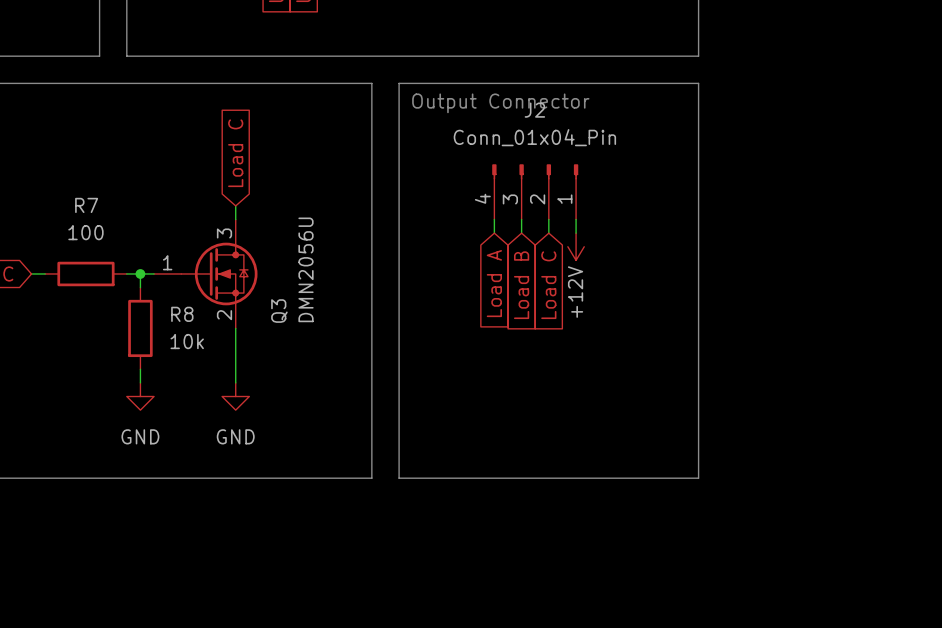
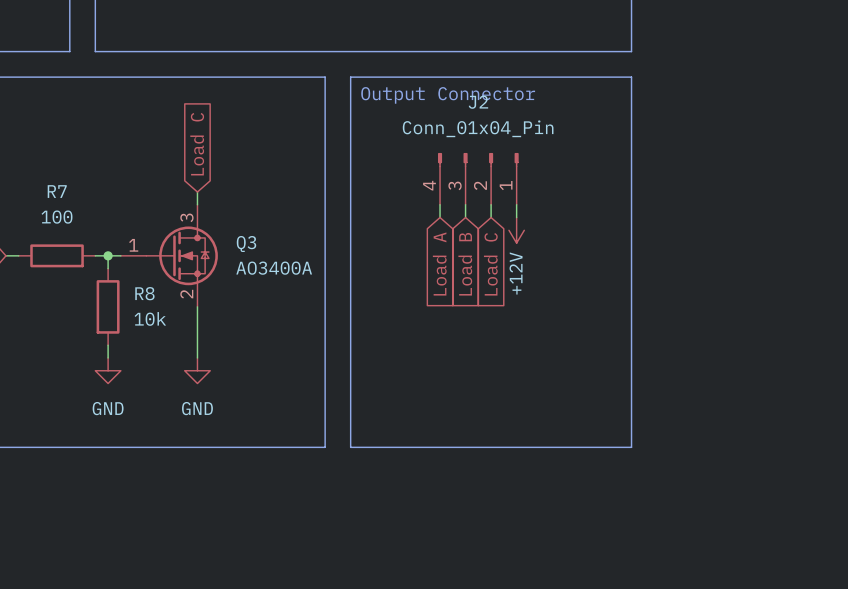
Q3 value: DMN2056U (306, 269) -> AO3400A (274, 268)
Q3 name rotation: 0° (279, 311) -> 90° clockwise (246, 243)
Q3 name position: Q3 (279, 311) -> Q3 (246, 243)

